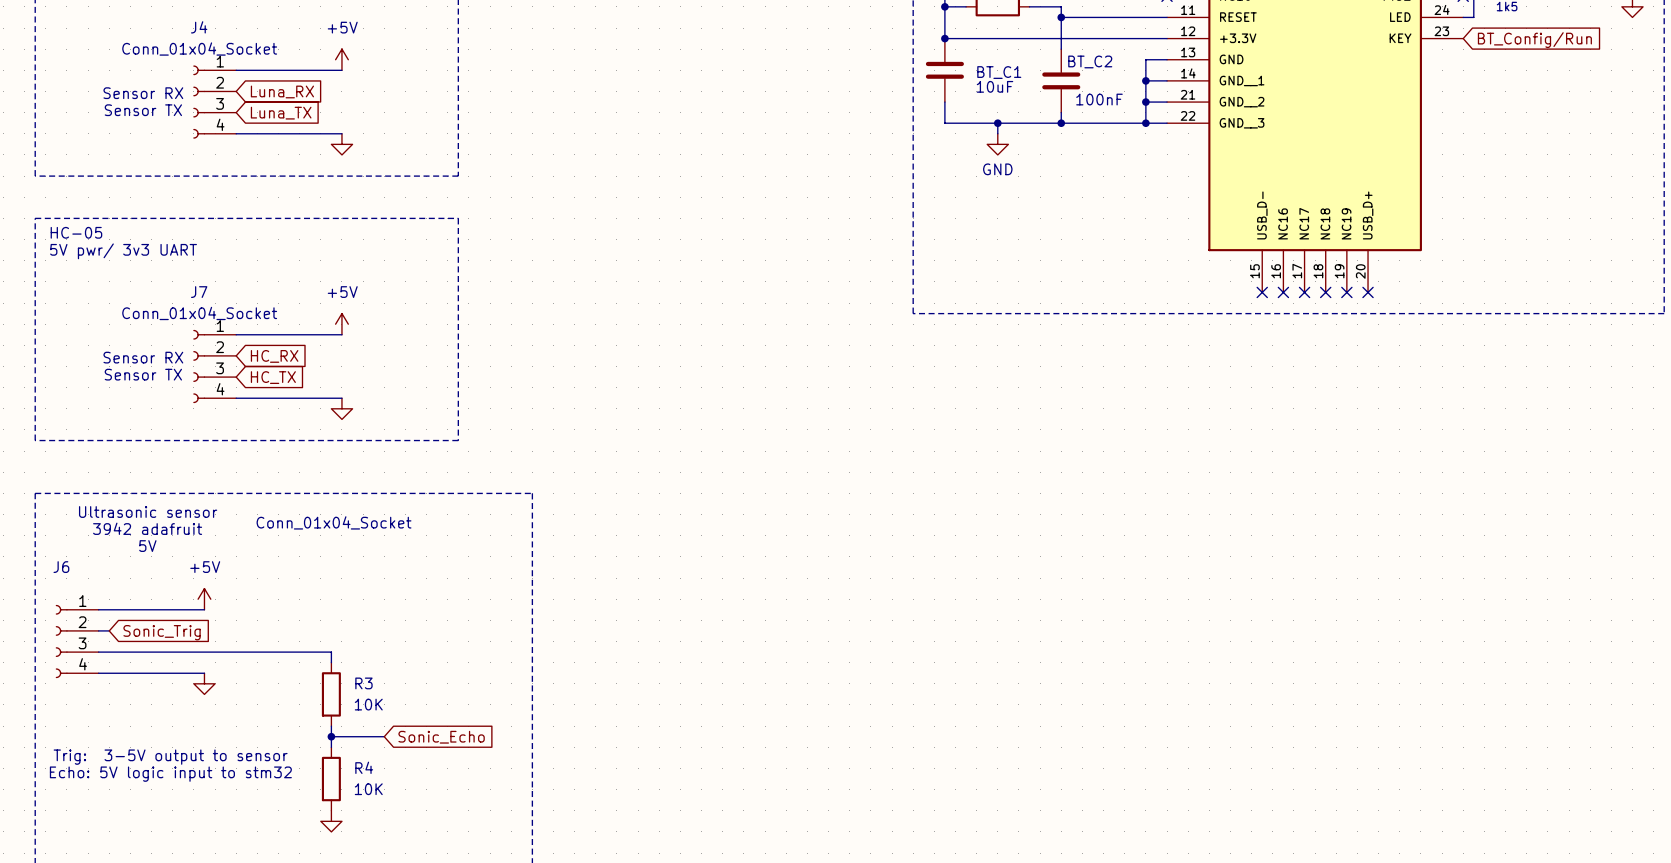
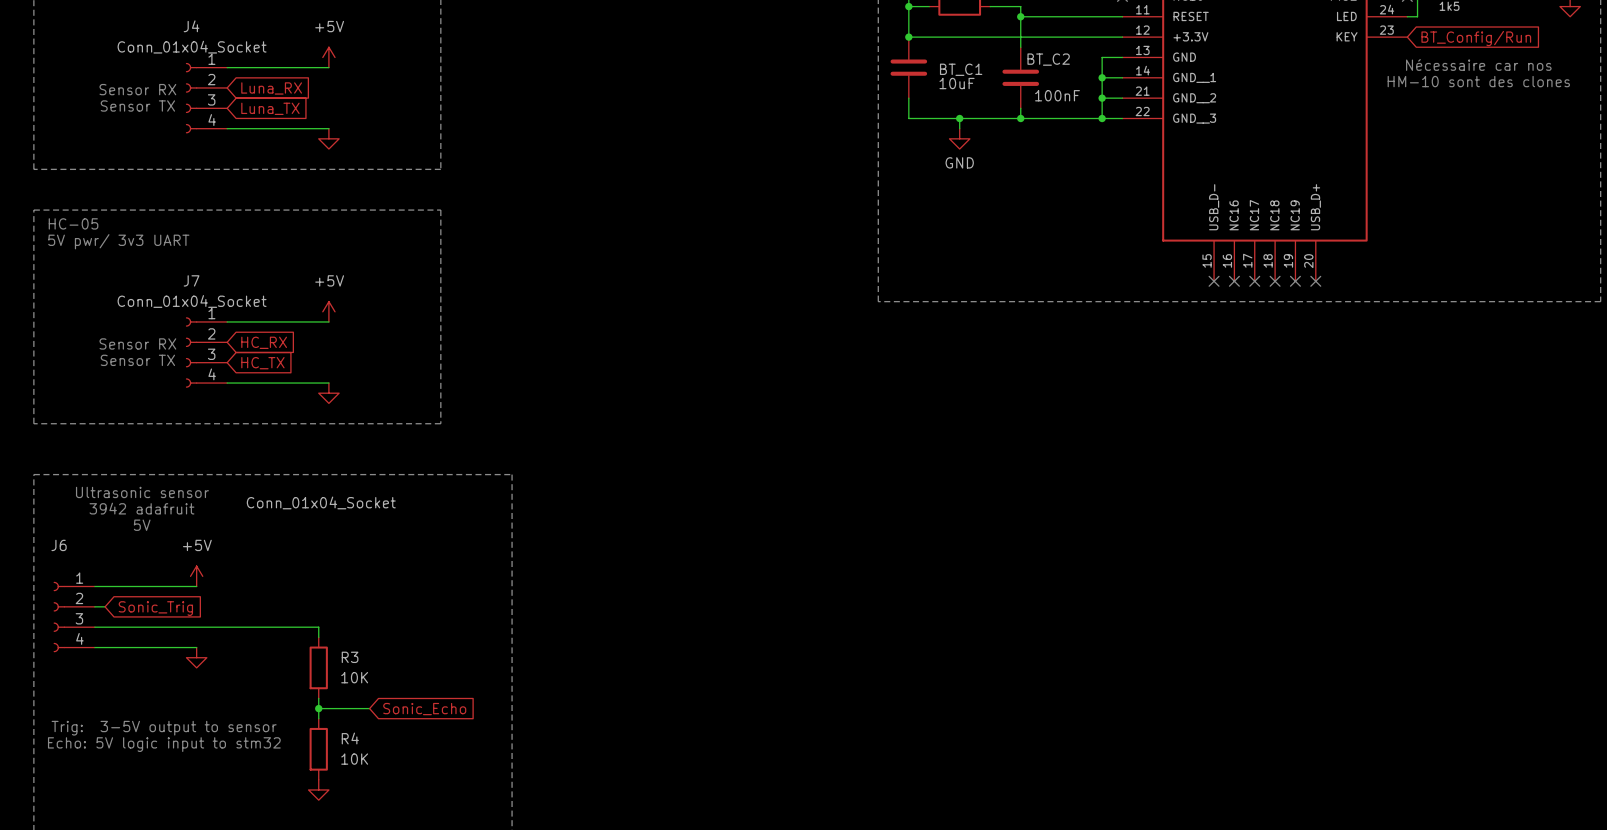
text: none -> Nécessaire car nos (1478, 64)
text: none -> HM-10 sont des clones (1478, 81)

